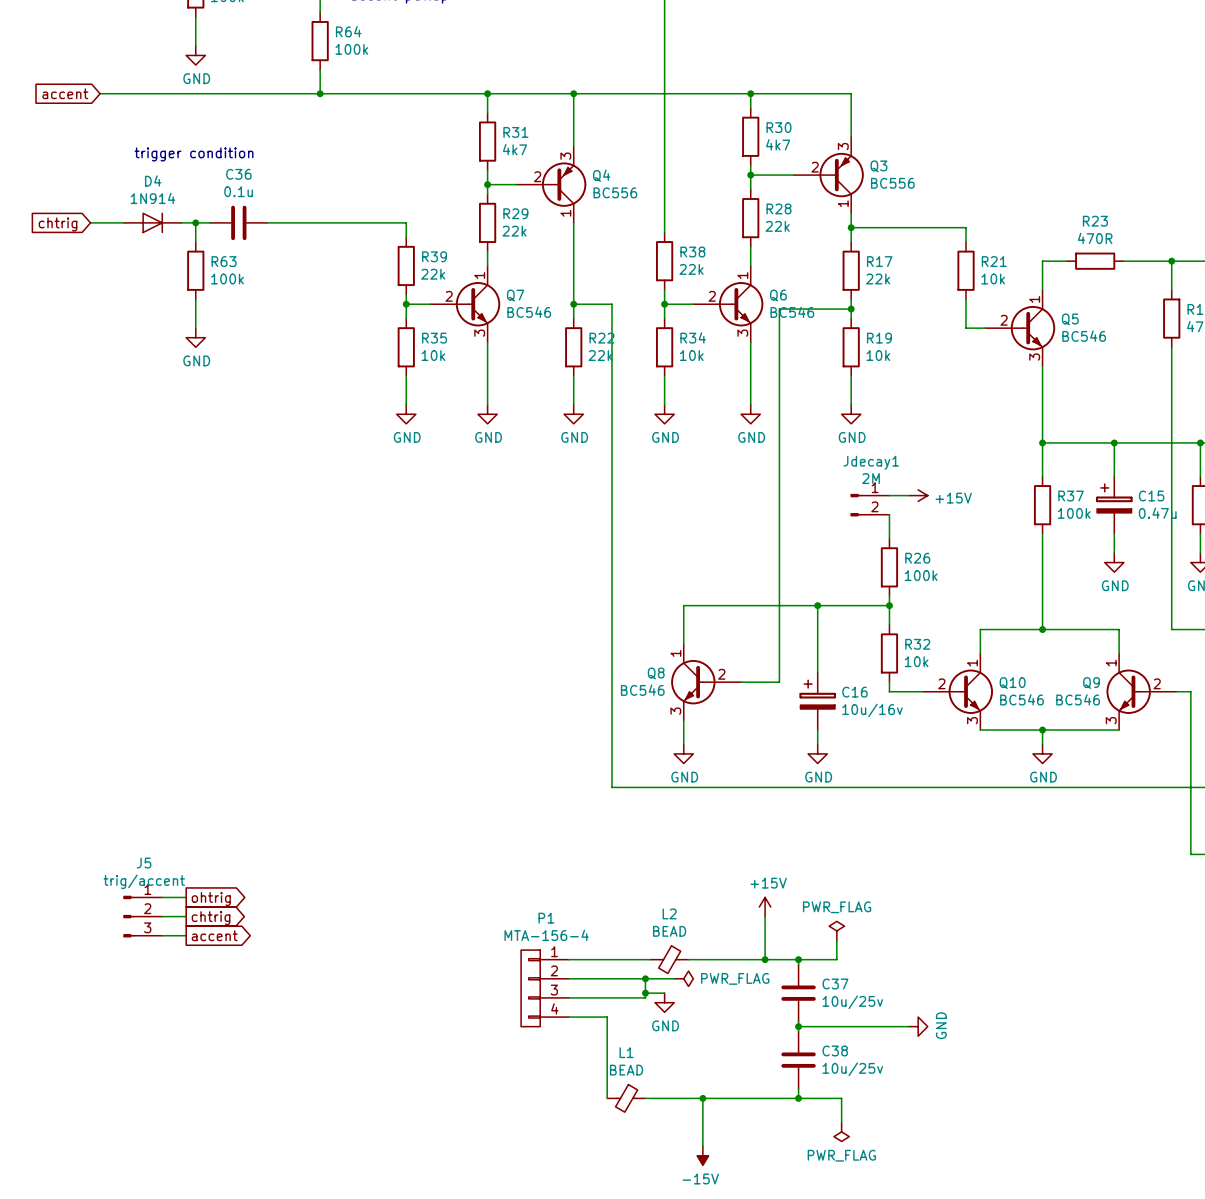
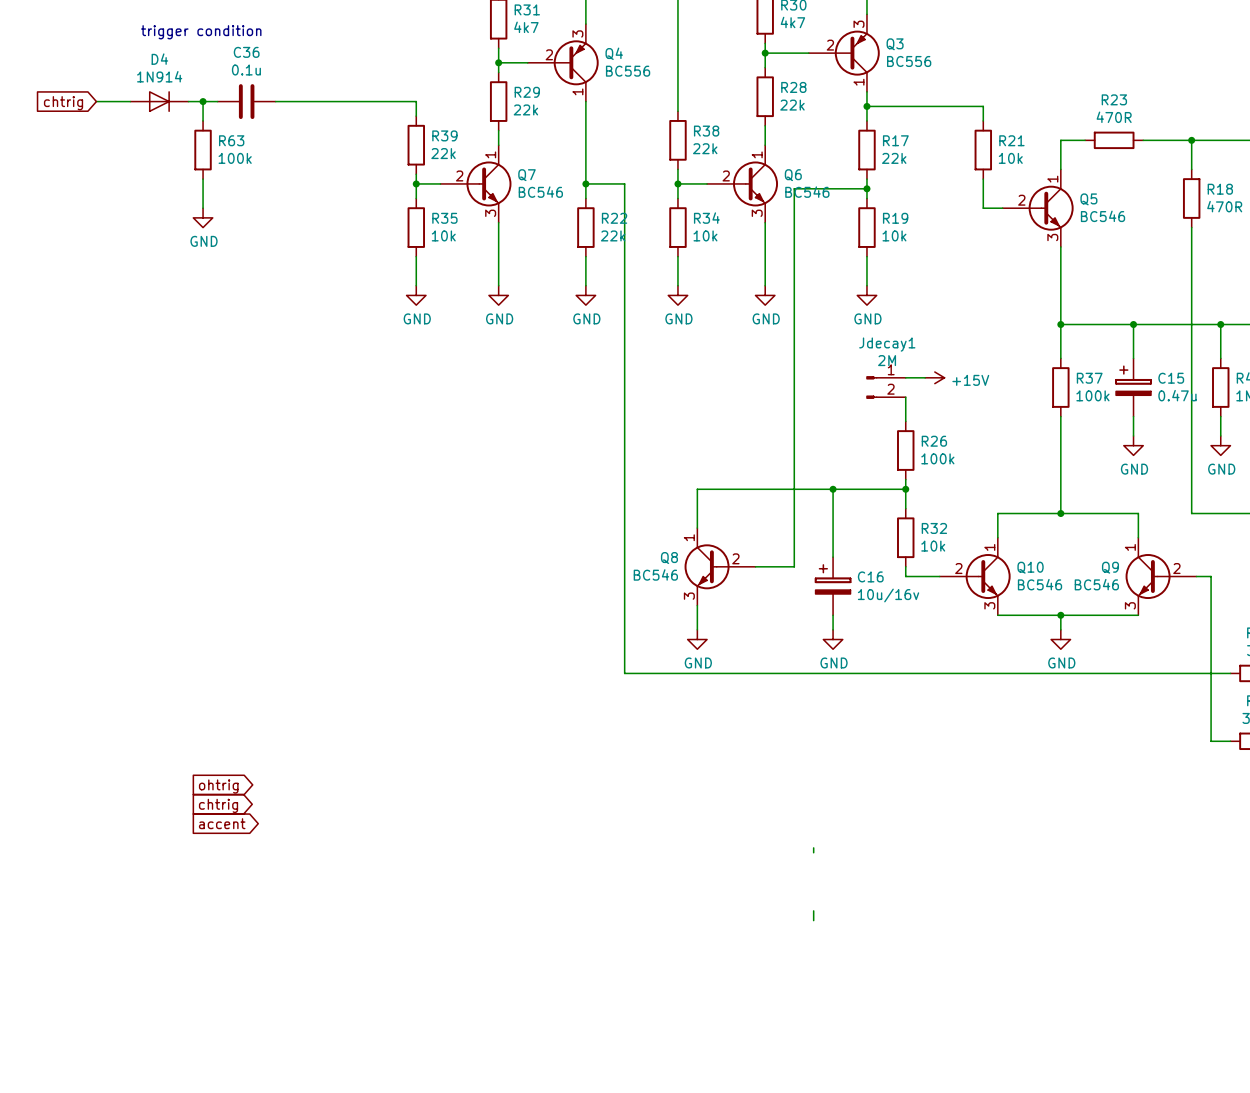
wire: (162, 897) (186, 897) -> none
power symbol: +15V (765, 907) -> none
J5: trig/accent (142, 916) -> none
wire: (162, 916) (186, 916) -> none
wire: (765, 916) (765, 959) -> none
power symbol: PWR_FLAG (836, 930) -> none
wire: (162, 935) (186, 935) -> none
wire: (836, 940) (836, 959) (688, 959) -> none
wire: (568, 959) (650, 959) -> none
L2: BEAD (669, 959) -> none
junction: (765, 959) -> none
junction: (798, 959) -> none
wire: (568, 978) (674, 978) -> none
wire: (645, 978) (645, 997) (568, 997) -> none
junction: (645, 978) -> none
power symbol: PWR_FLAG (683, 978) -> none
P1: MTA-156-4 (545, 988) -> none
wire: (645, 993) (664, 993) -> none
junction: (645, 993) -> none
C37: 10u/25v (798, 993) -> none
power symbol: GND (664, 1002) -> none
wire: (568, 1017) (607, 1017) (607, 1098) -> none
wire: (798, 1026) (908, 1026) -> none
junction: (798, 1026) -> none
power symbol: GND (918, 1026) -> none
C38: 10u/25v (798, 1060) -> none
wire: (798, 1088) (798, 1098) -> none
L1: BEAD (626, 1098) -> none
wire: (645, 1098) (841, 1098) (841, 1122) -> none
wire: (702, 1098) (702, 1146) -> none
junction: (702, 1098) -> none
junction: (798, 1098) -> none
power symbol: PWR_FLAG (841, 1131) -> none
power symbol: -15V (702, 1155) -> none

